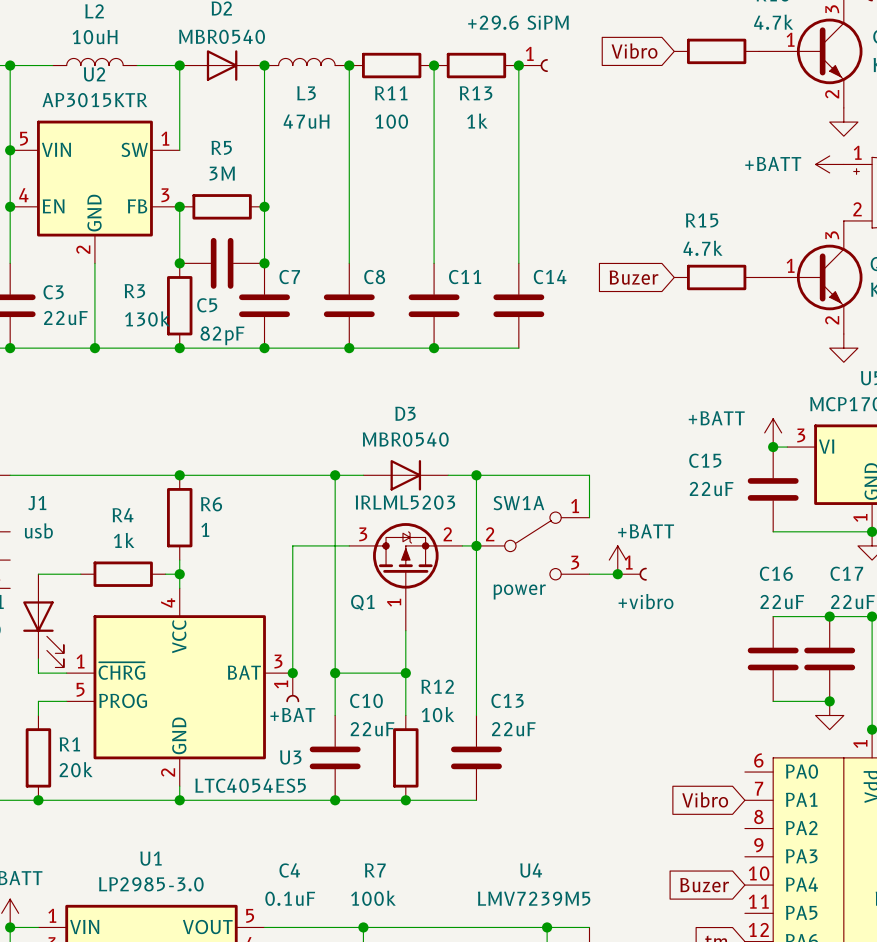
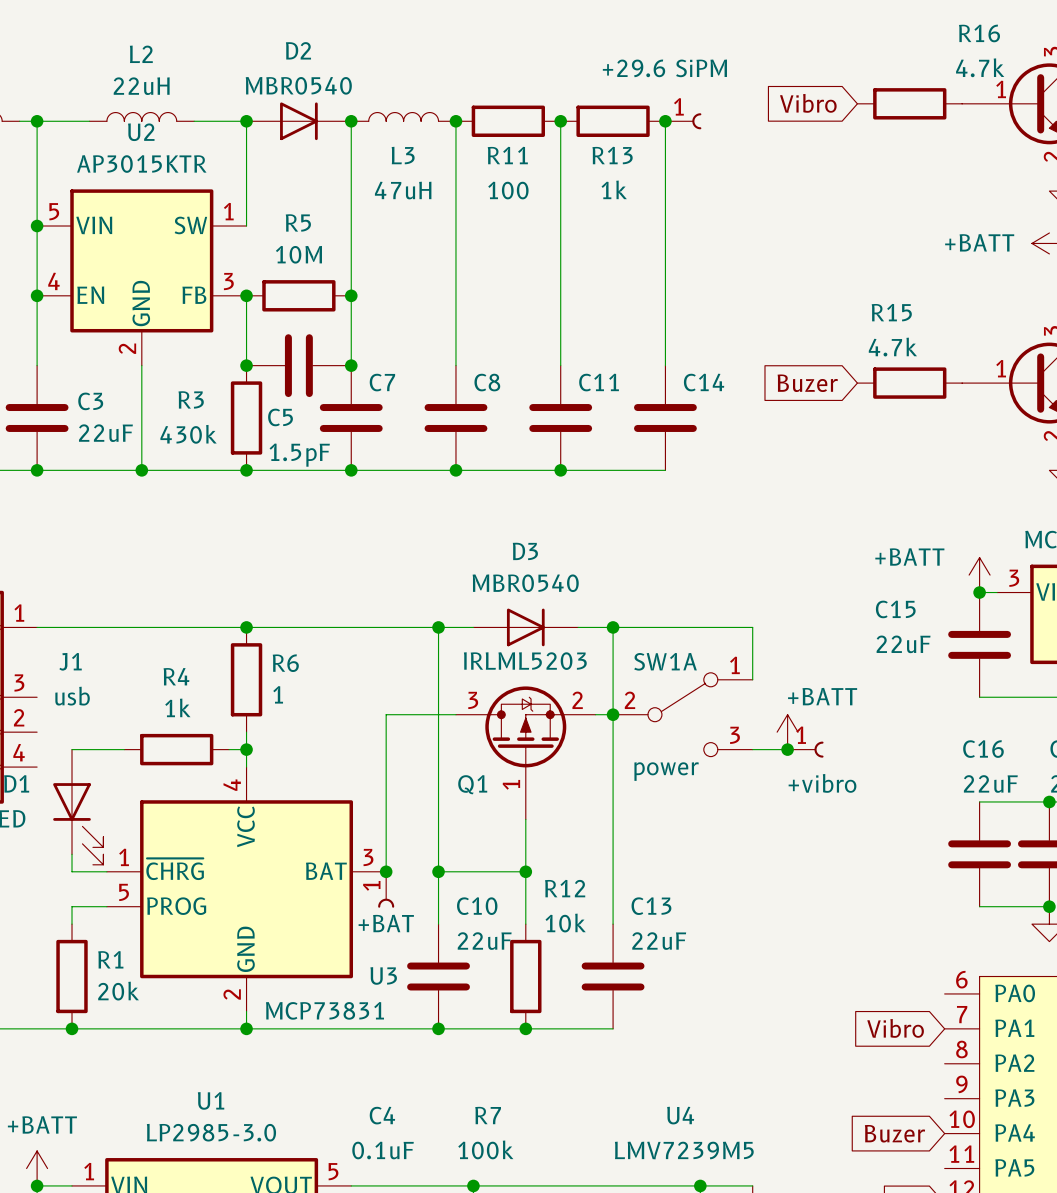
L2 value: 10uH (95, 37) -> 22uH (141, 86)
R5 value: 3M (222, 173) -> 10M (298, 254)
R3 value: 130k (147, 318) -> 430k (188, 434)
C5 value: 82pF (222, 335) -> 1.5pF (299, 455)
U3 value: LTC4054ES5 (250, 785) -> MCP73831 (324, 1010)

